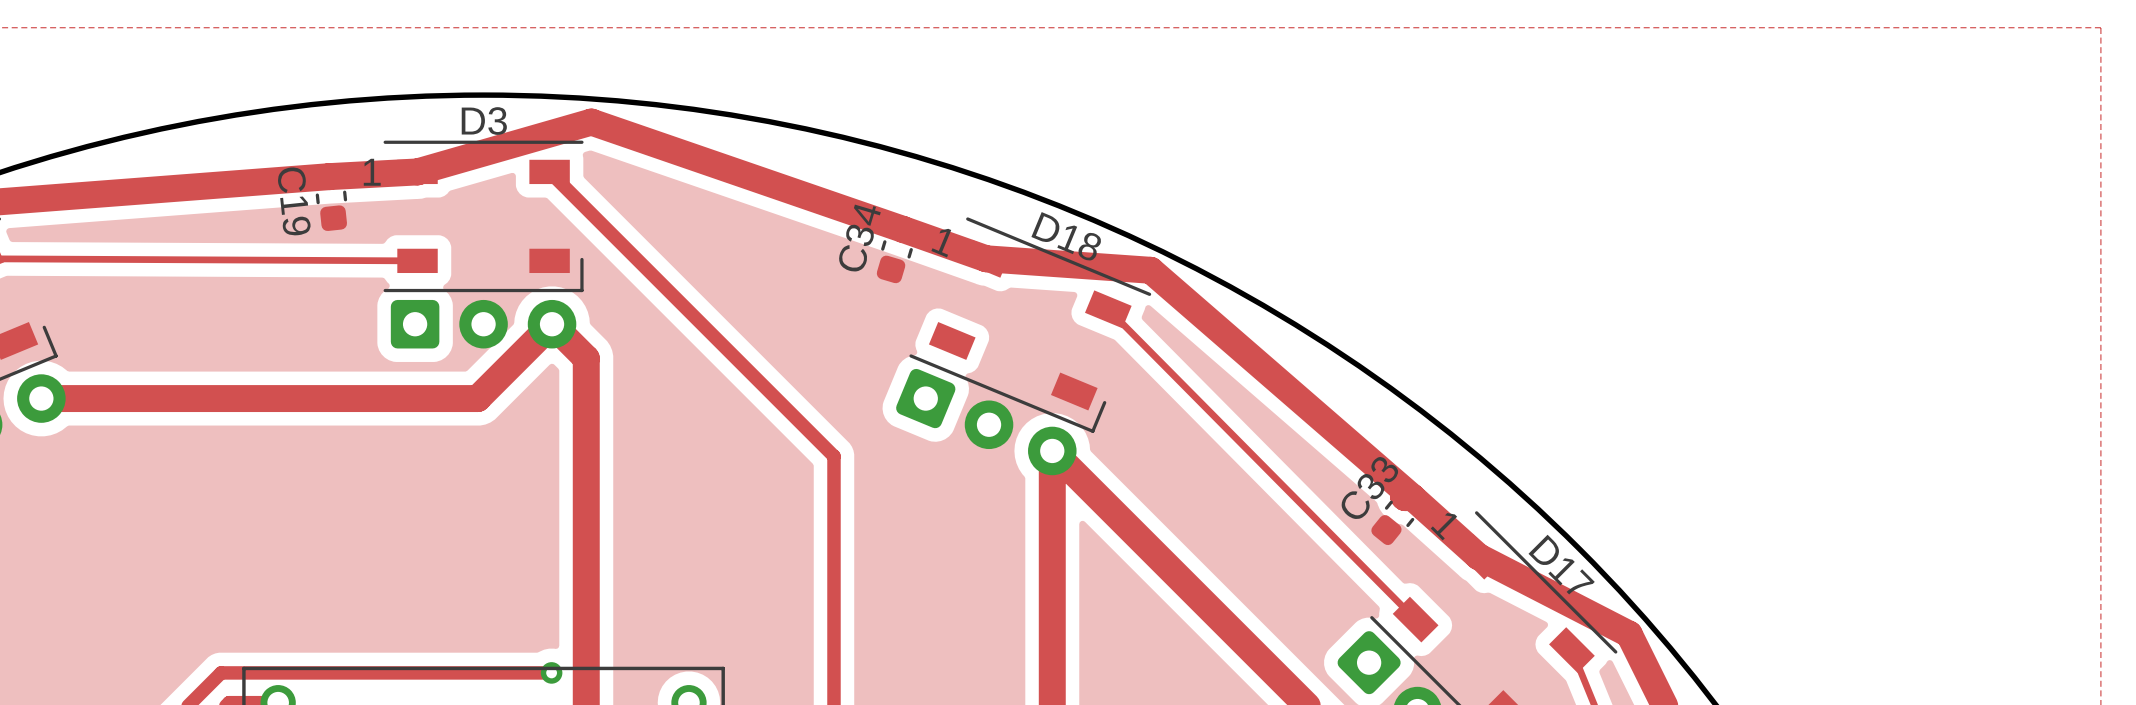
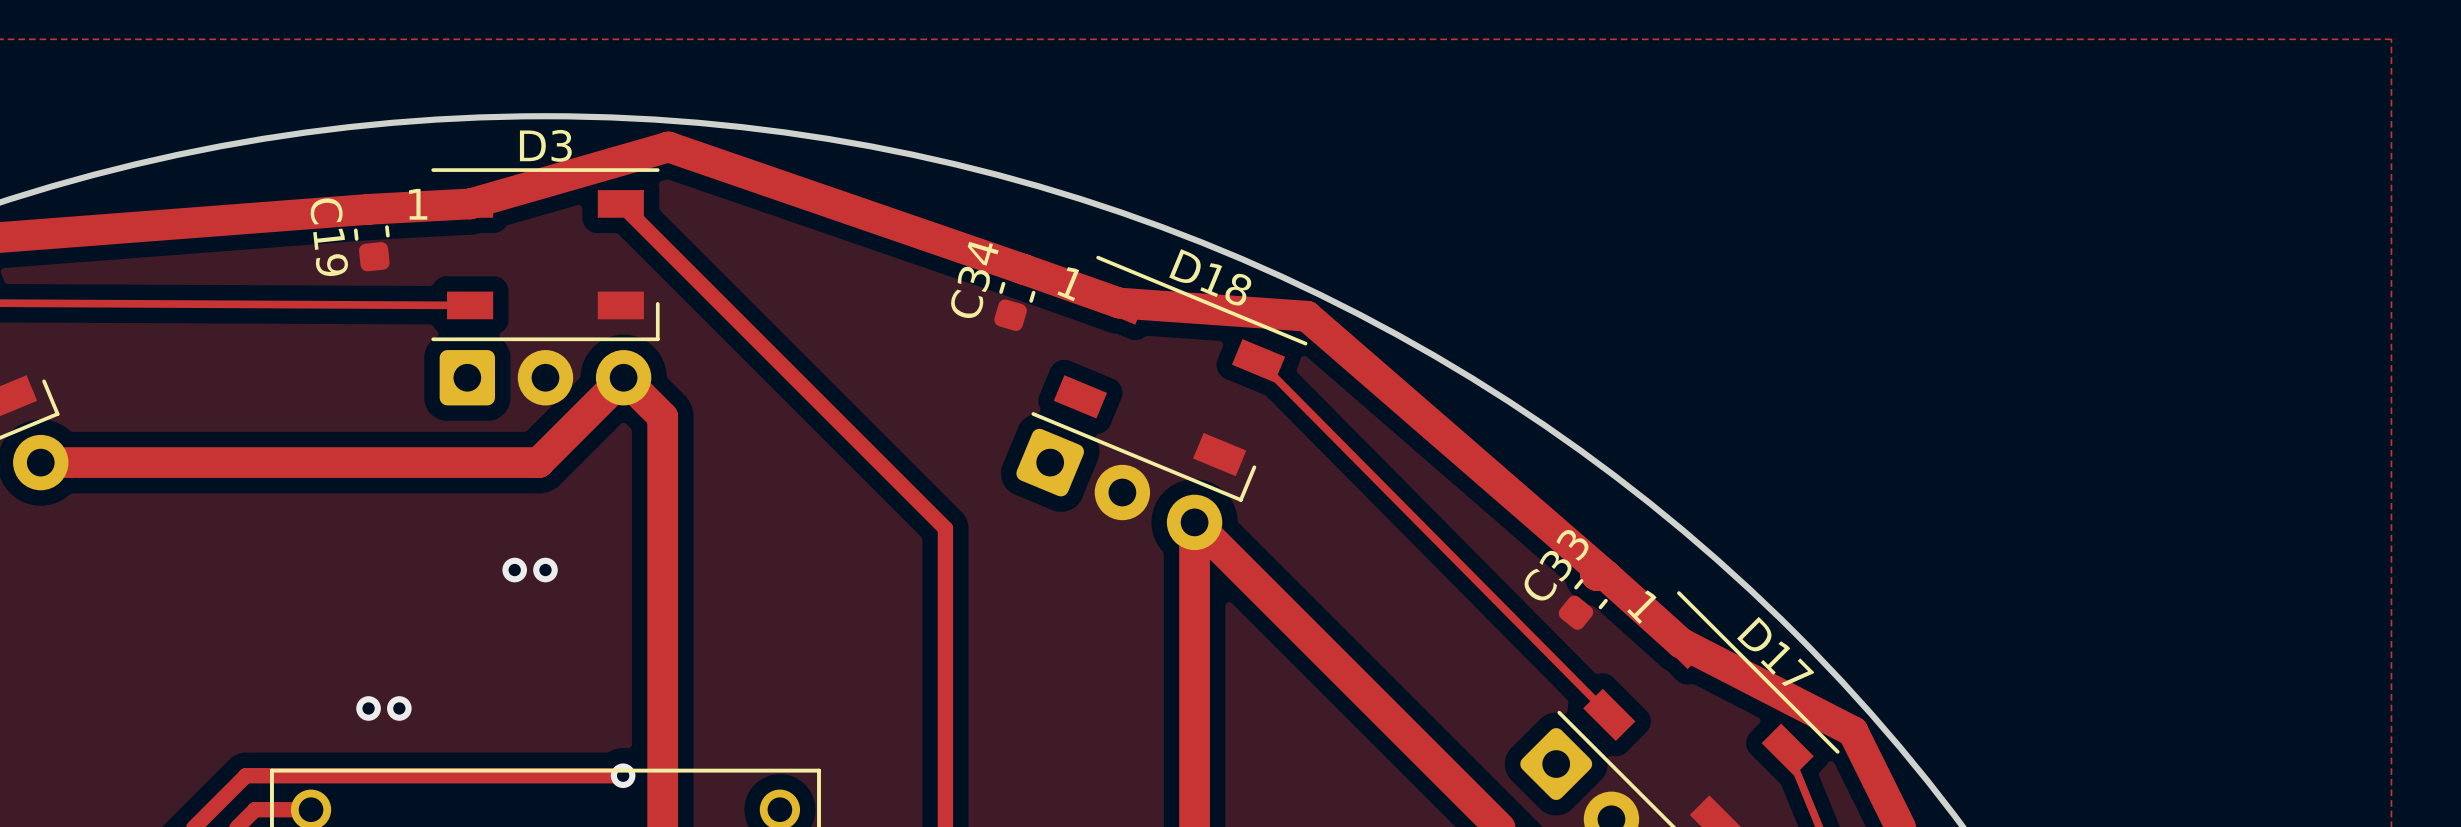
via: none -> (514, 570)
via: none -> (545, 570)
via: none -> (368, 708)
via: none -> (399, 708)

